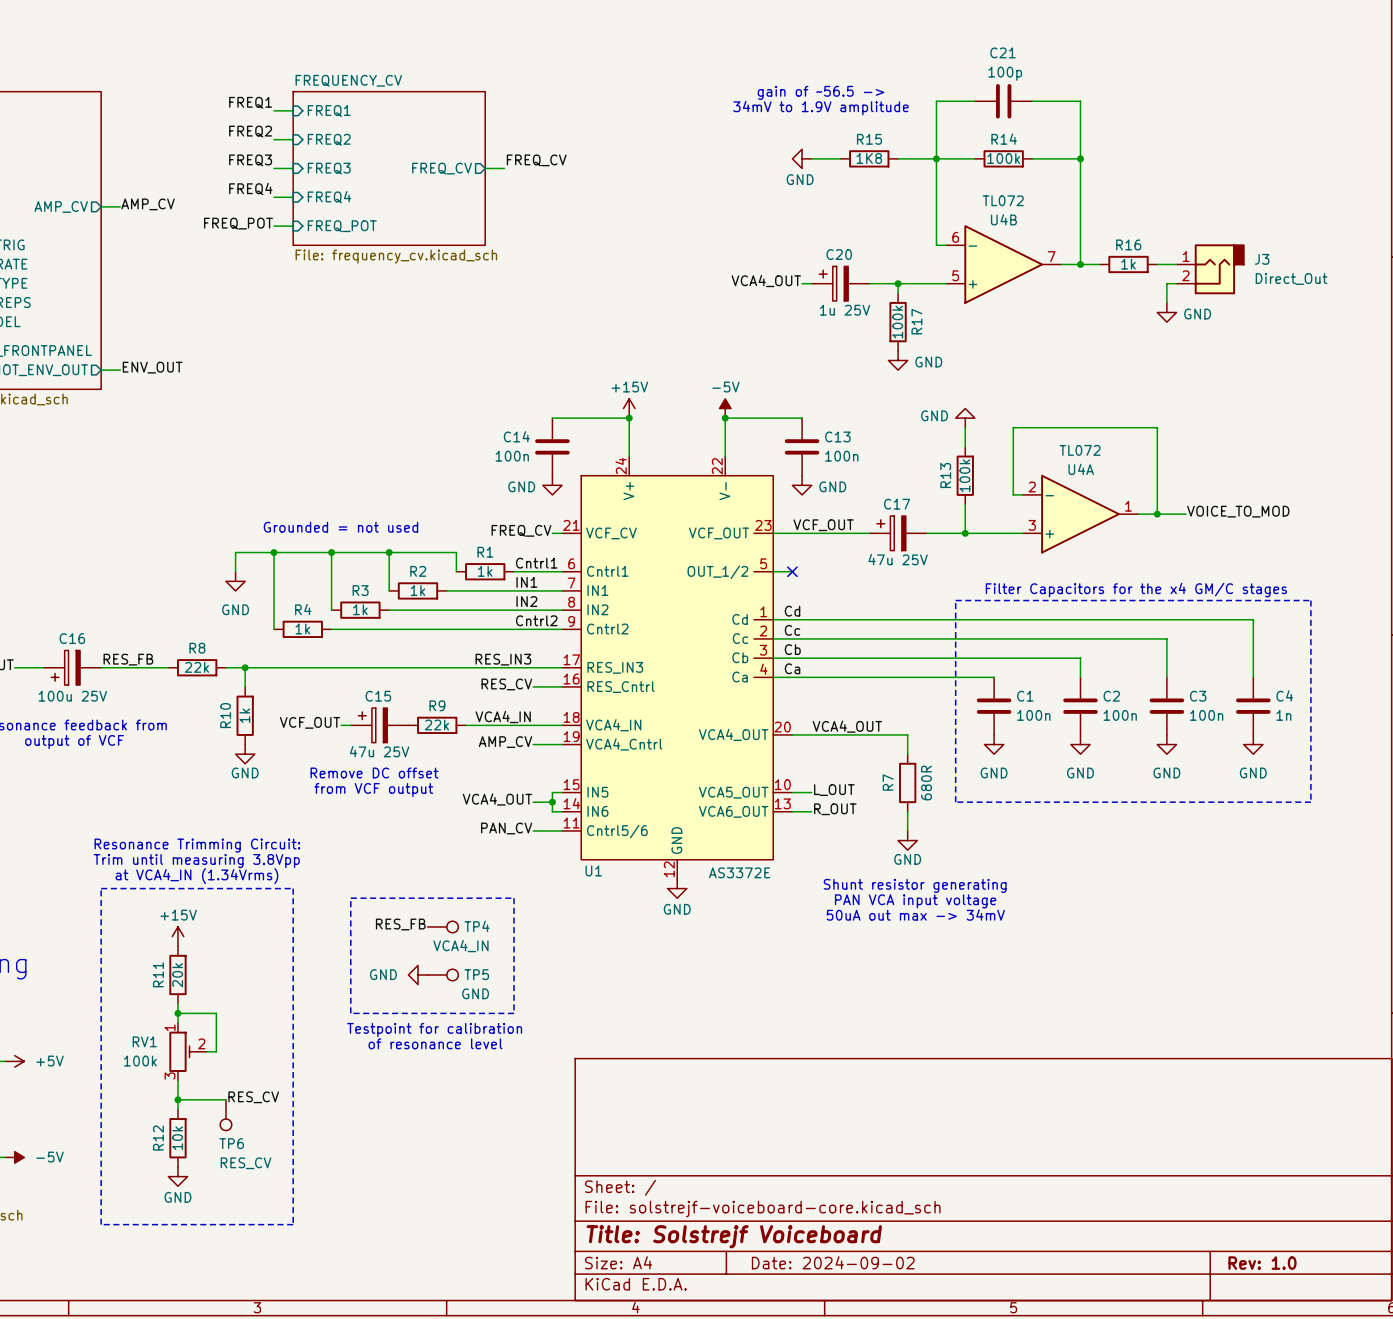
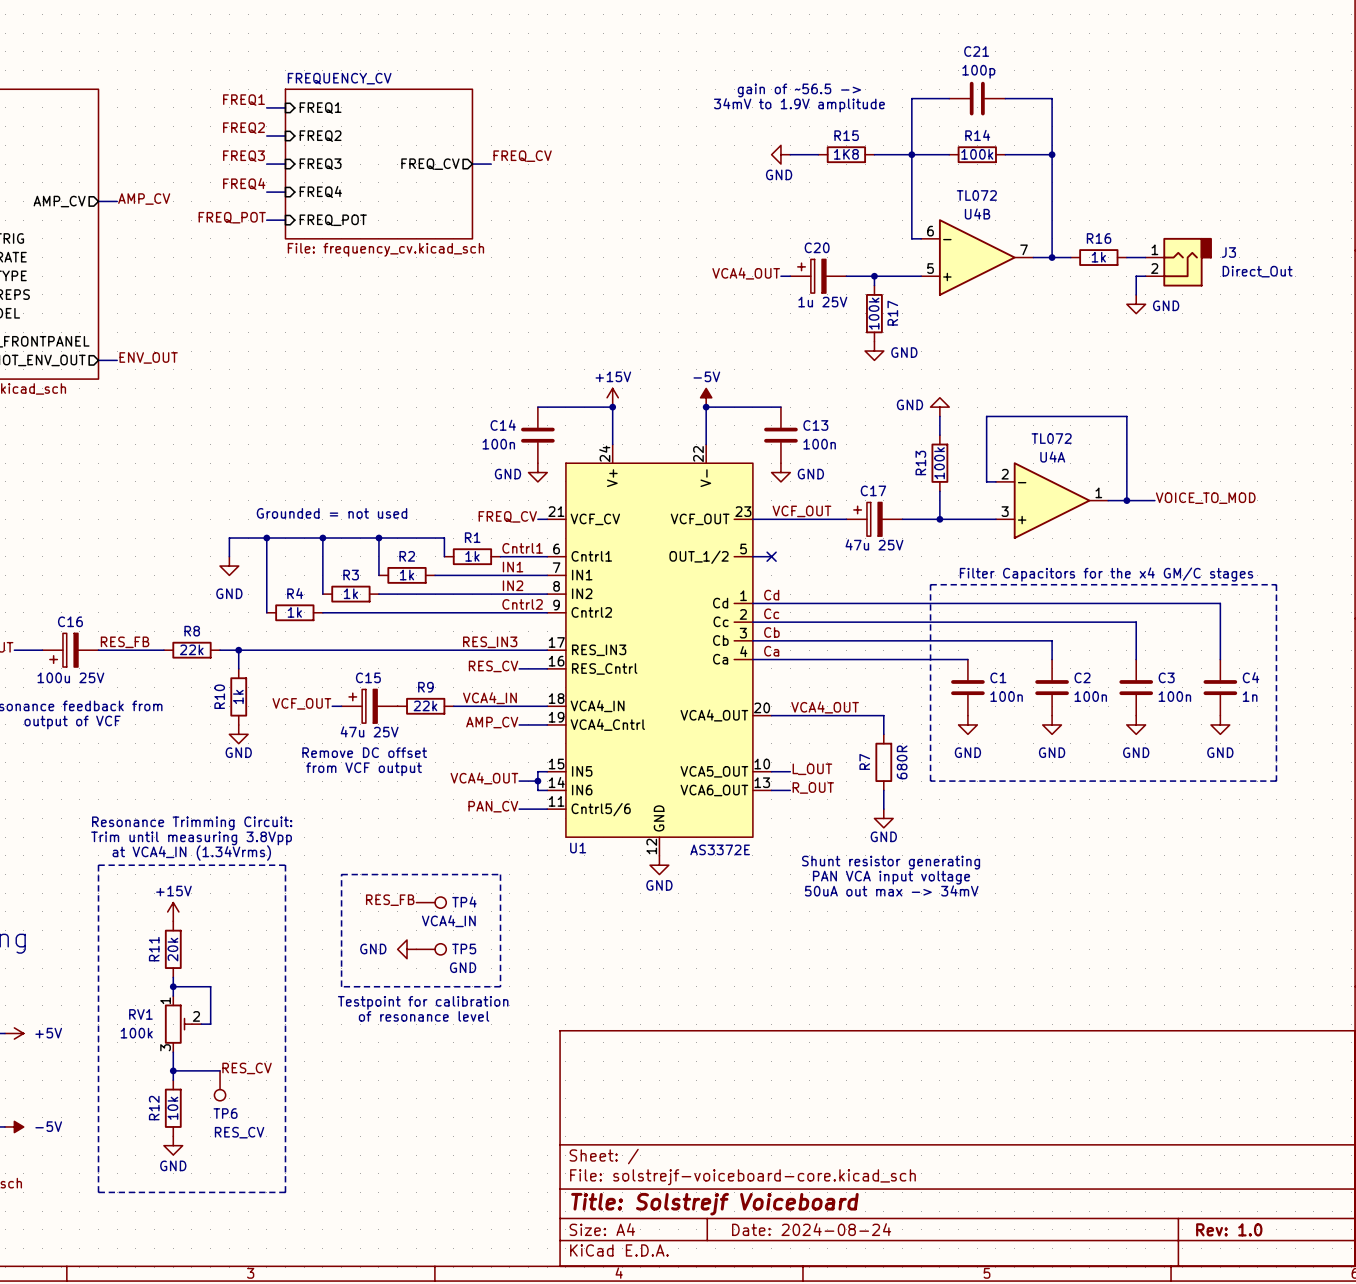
title block: Date: 2024-09-02 (833, 1262) -> Date: 2024-08-24 (811, 1229)

